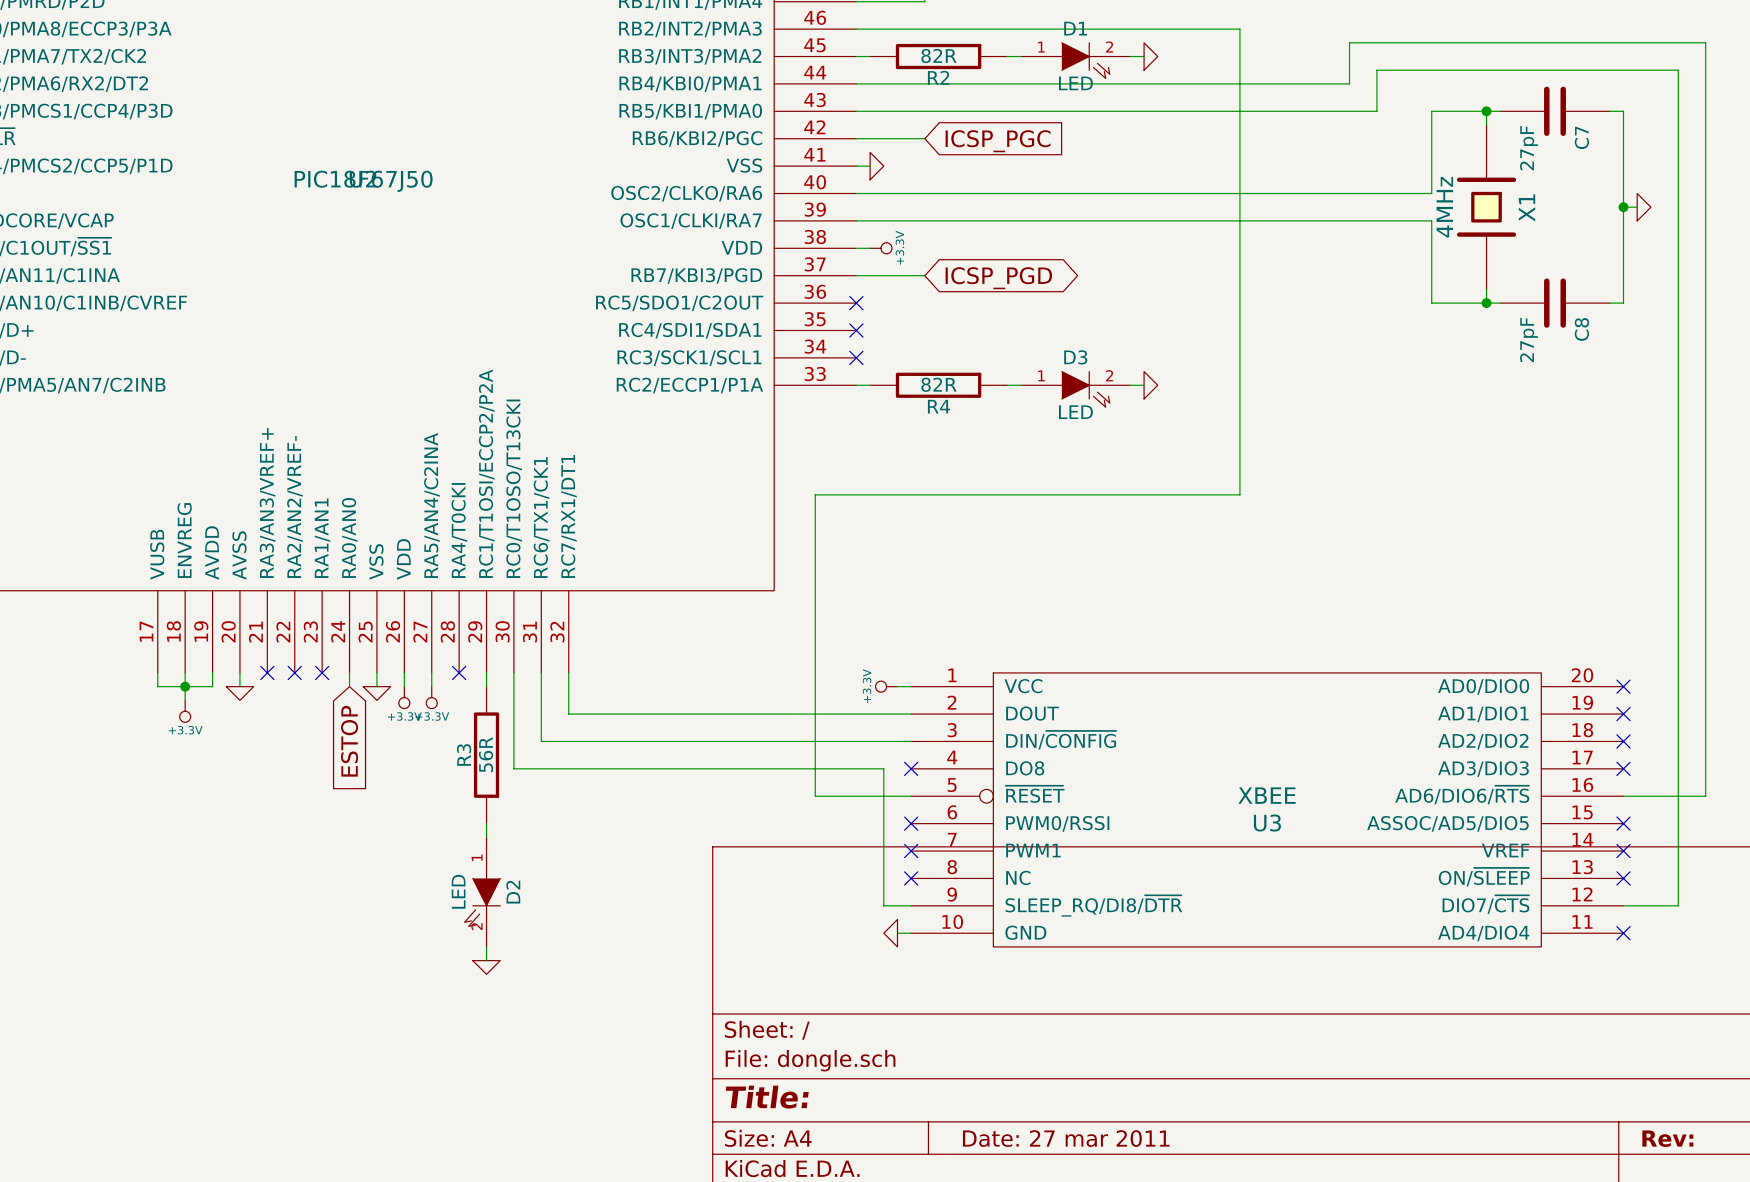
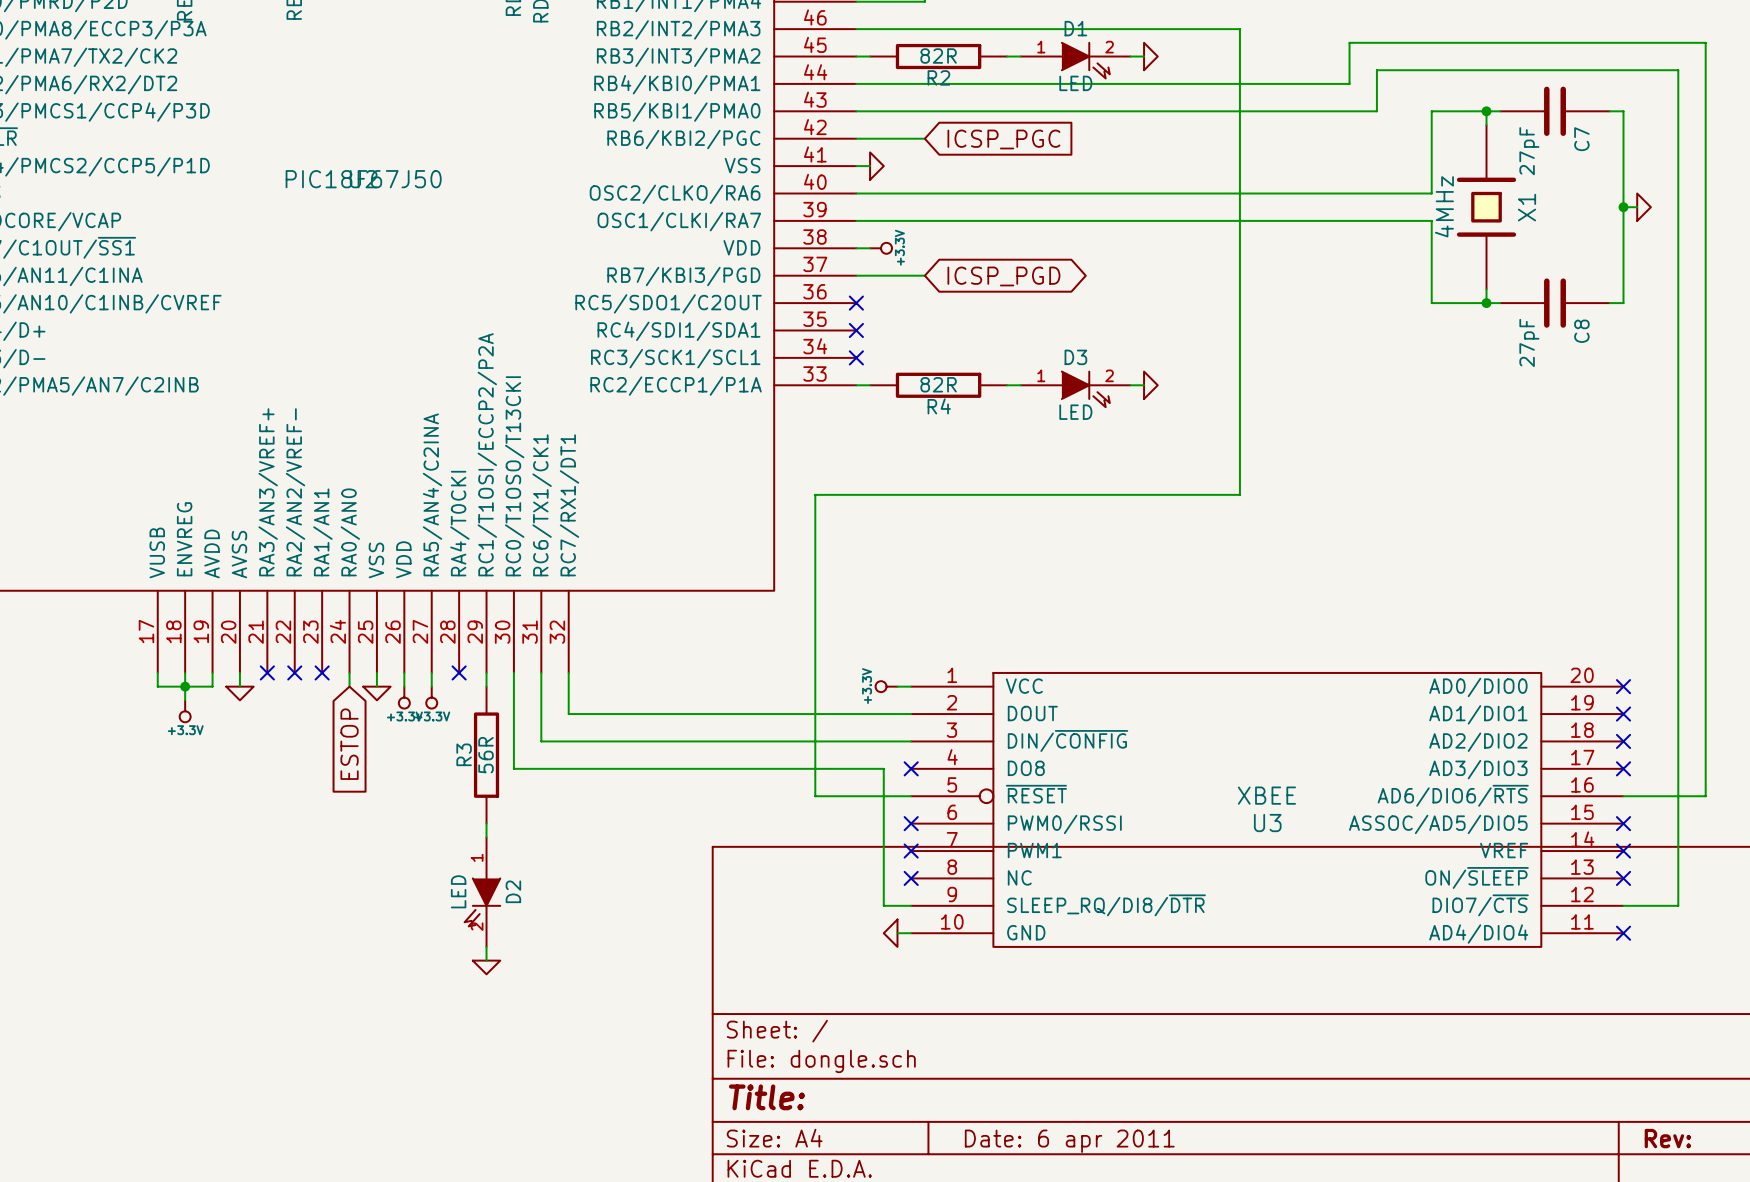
title block: Date: 27 mar 2011 (1066, 1138) -> Date: 6 apr 2011 (1069, 1141)

